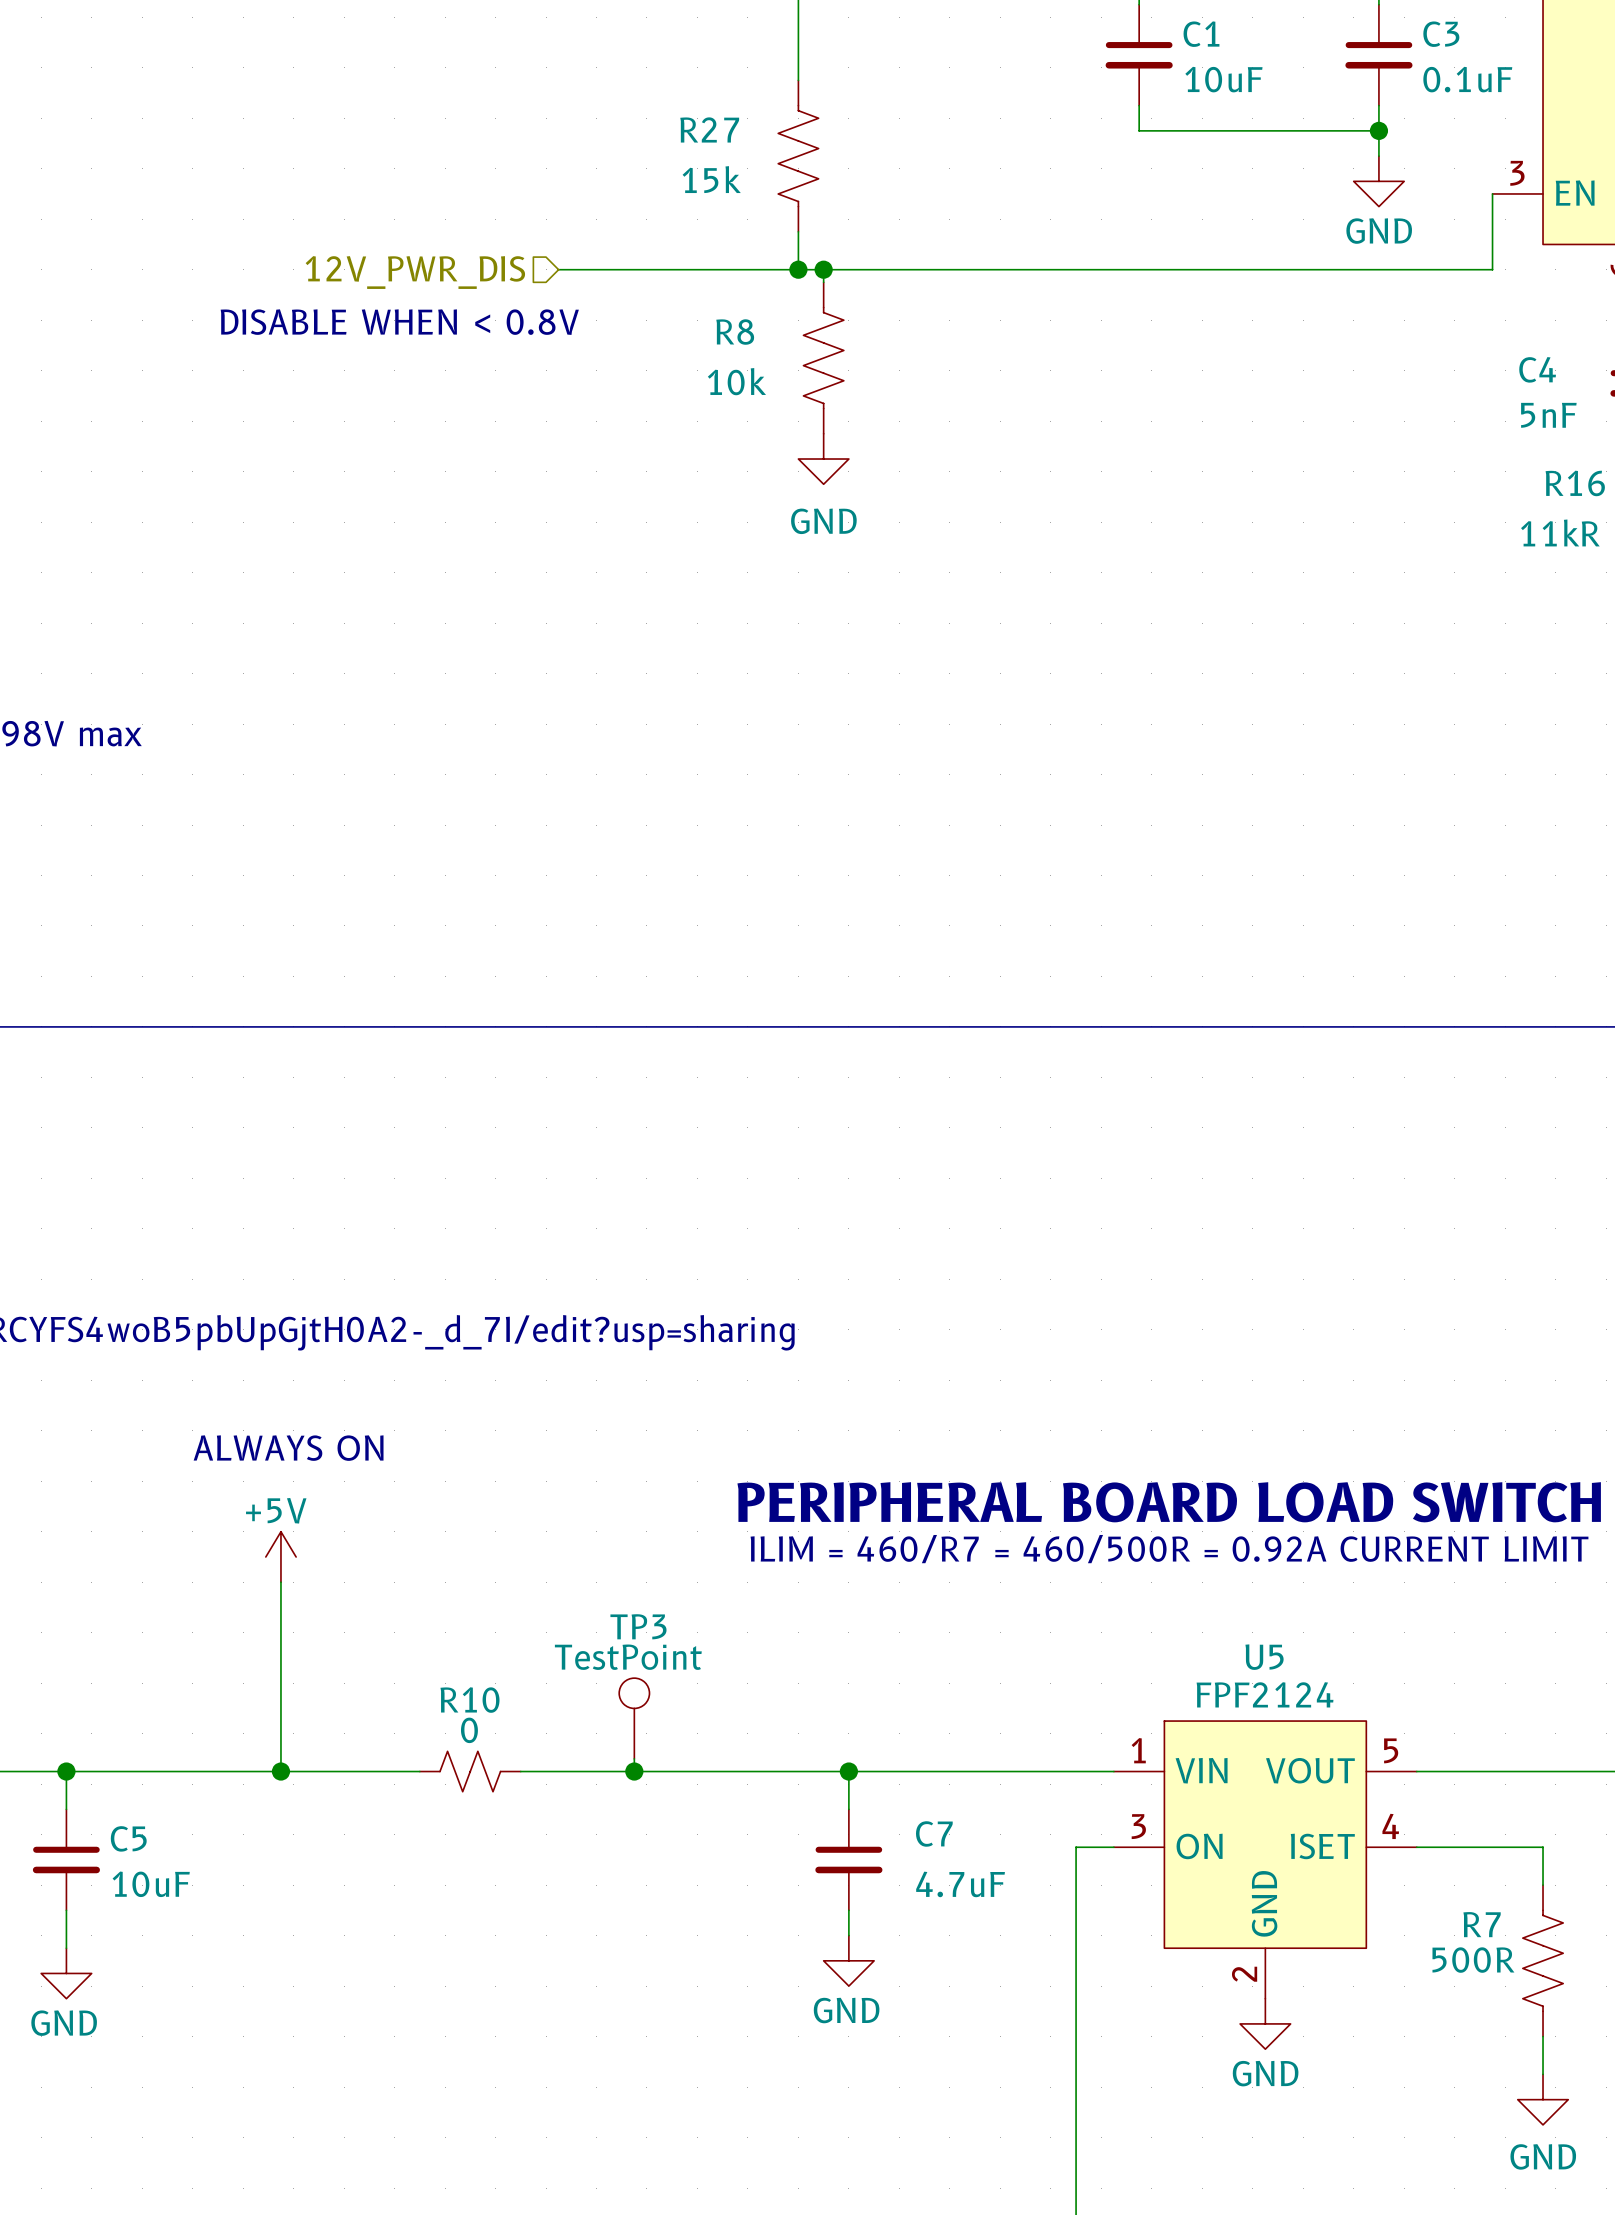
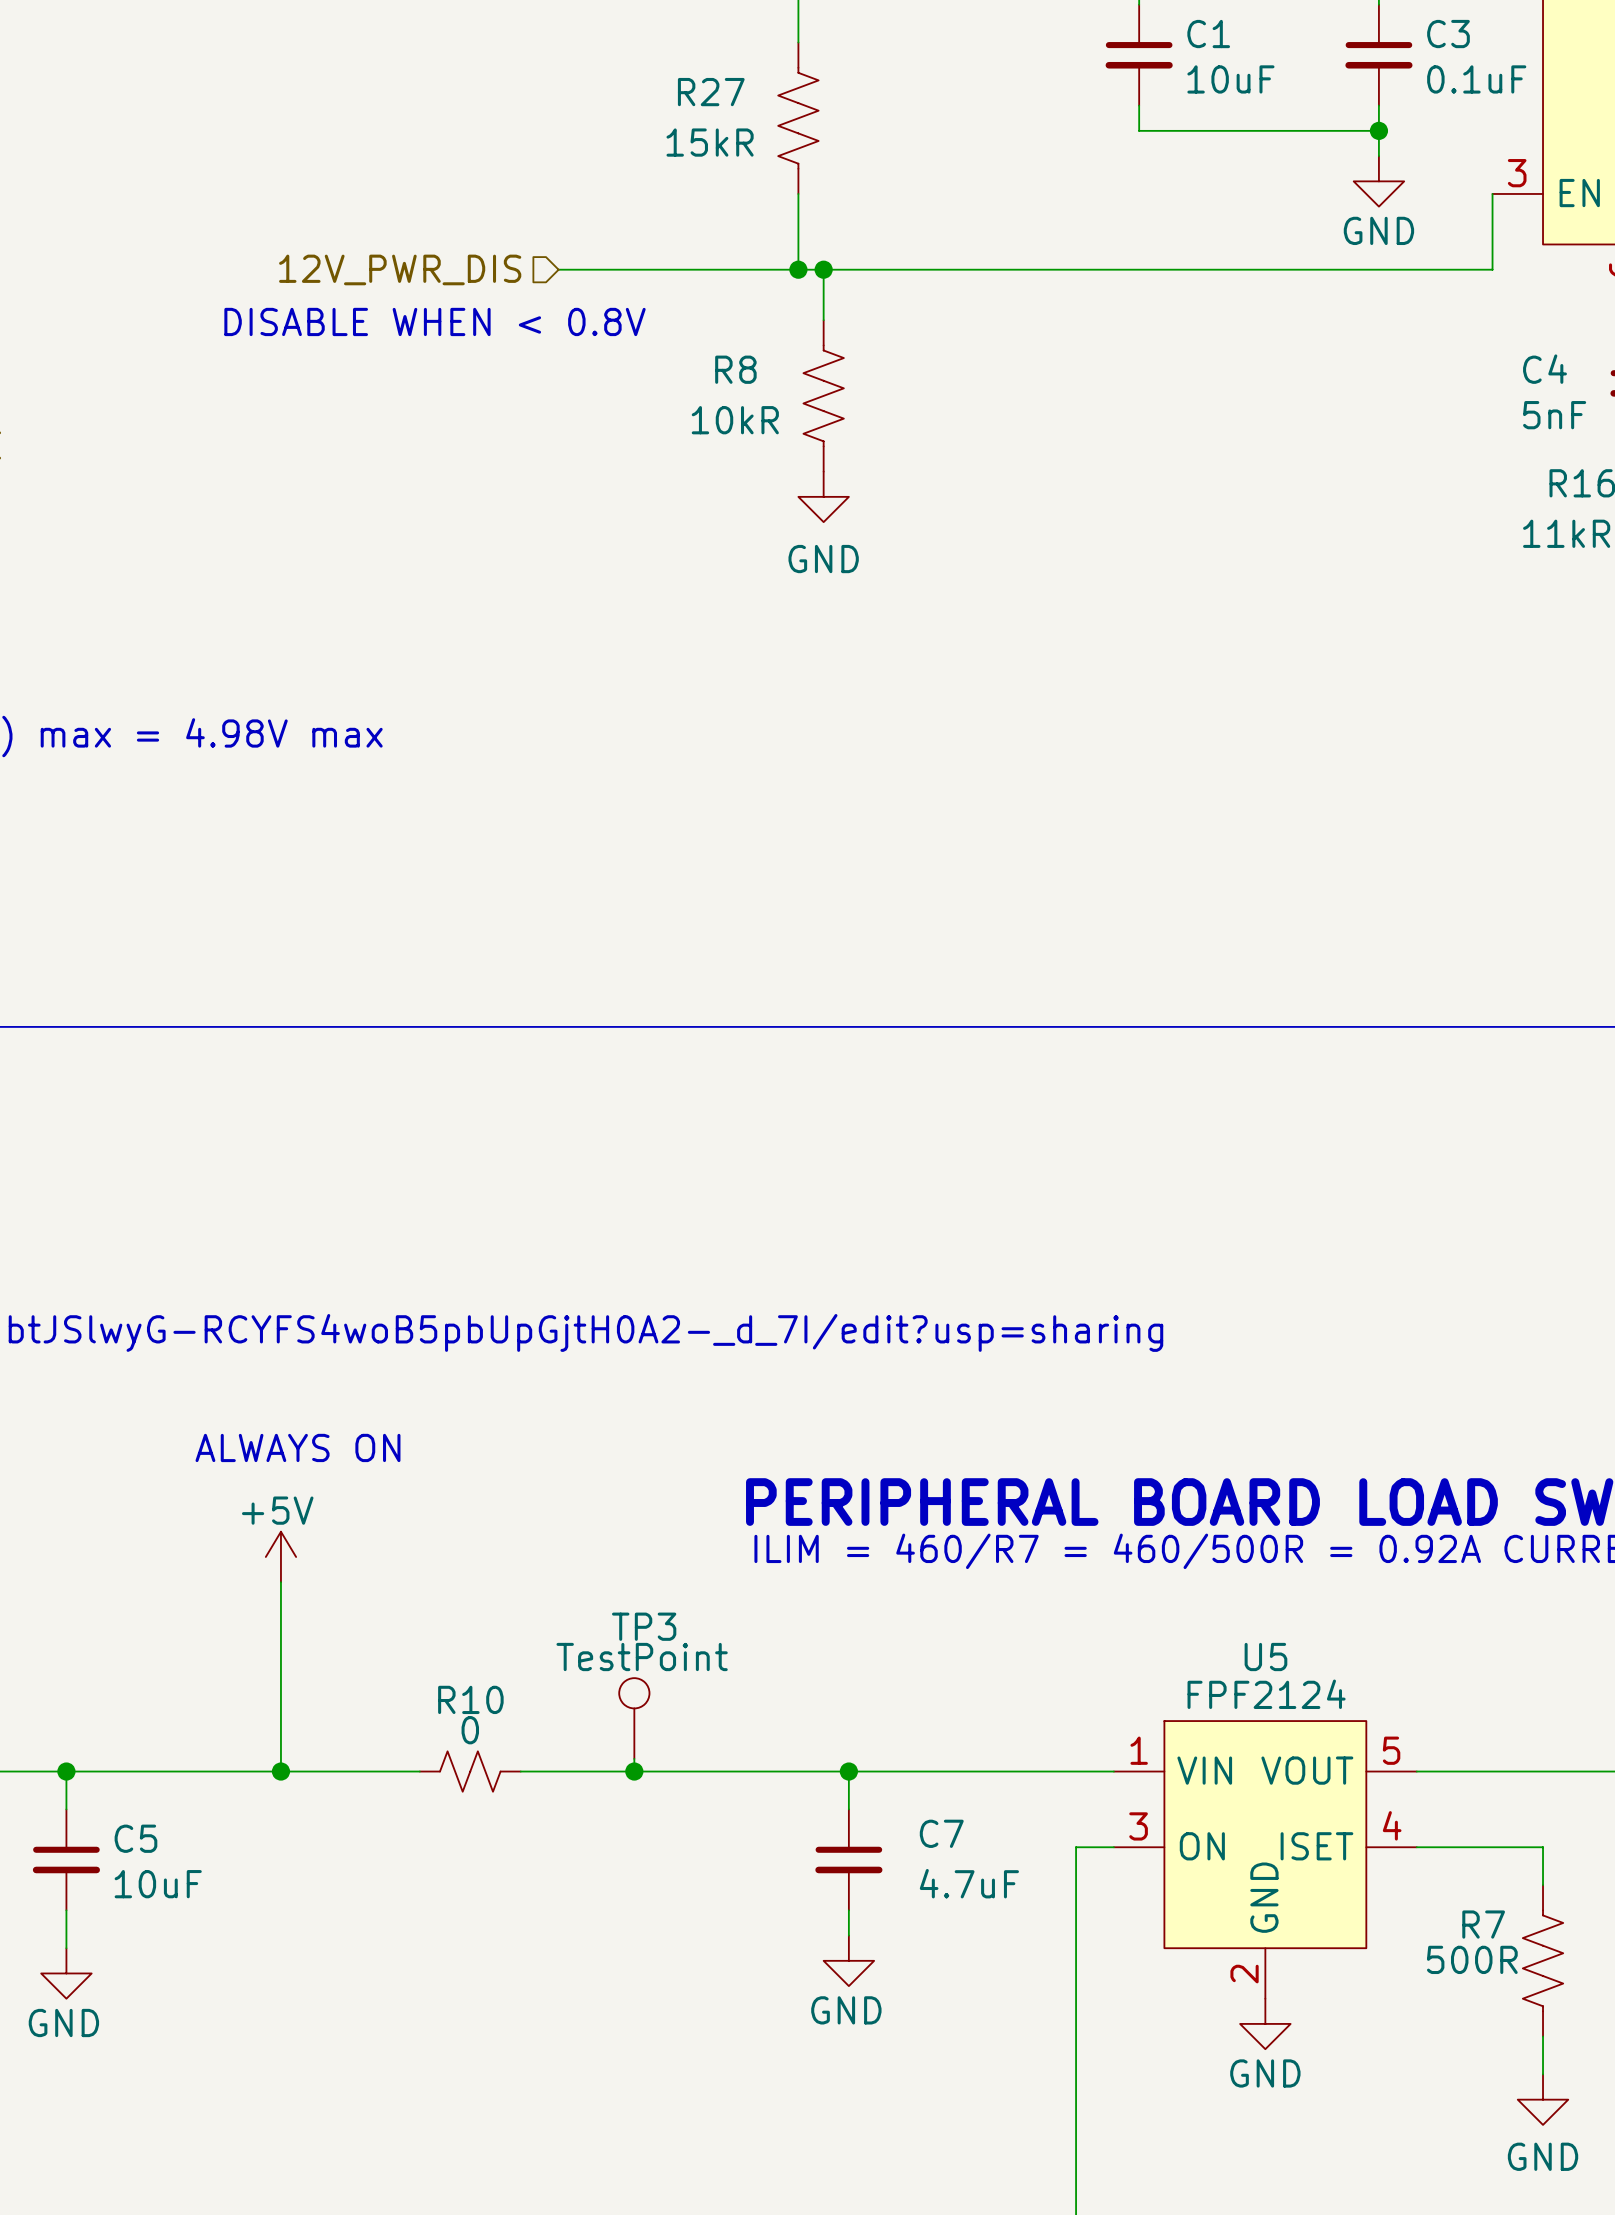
R27 position: (798, 156) -> (798, 118)
R27 value: 15k (711, 179) -> 15kR (710, 142)
R8 position: (823, 358) -> (823, 395)
R8 value: 10k (736, 381) -> 10kR (735, 420)
power symbol position: GND (823, 459) -> GND (823, 496)

